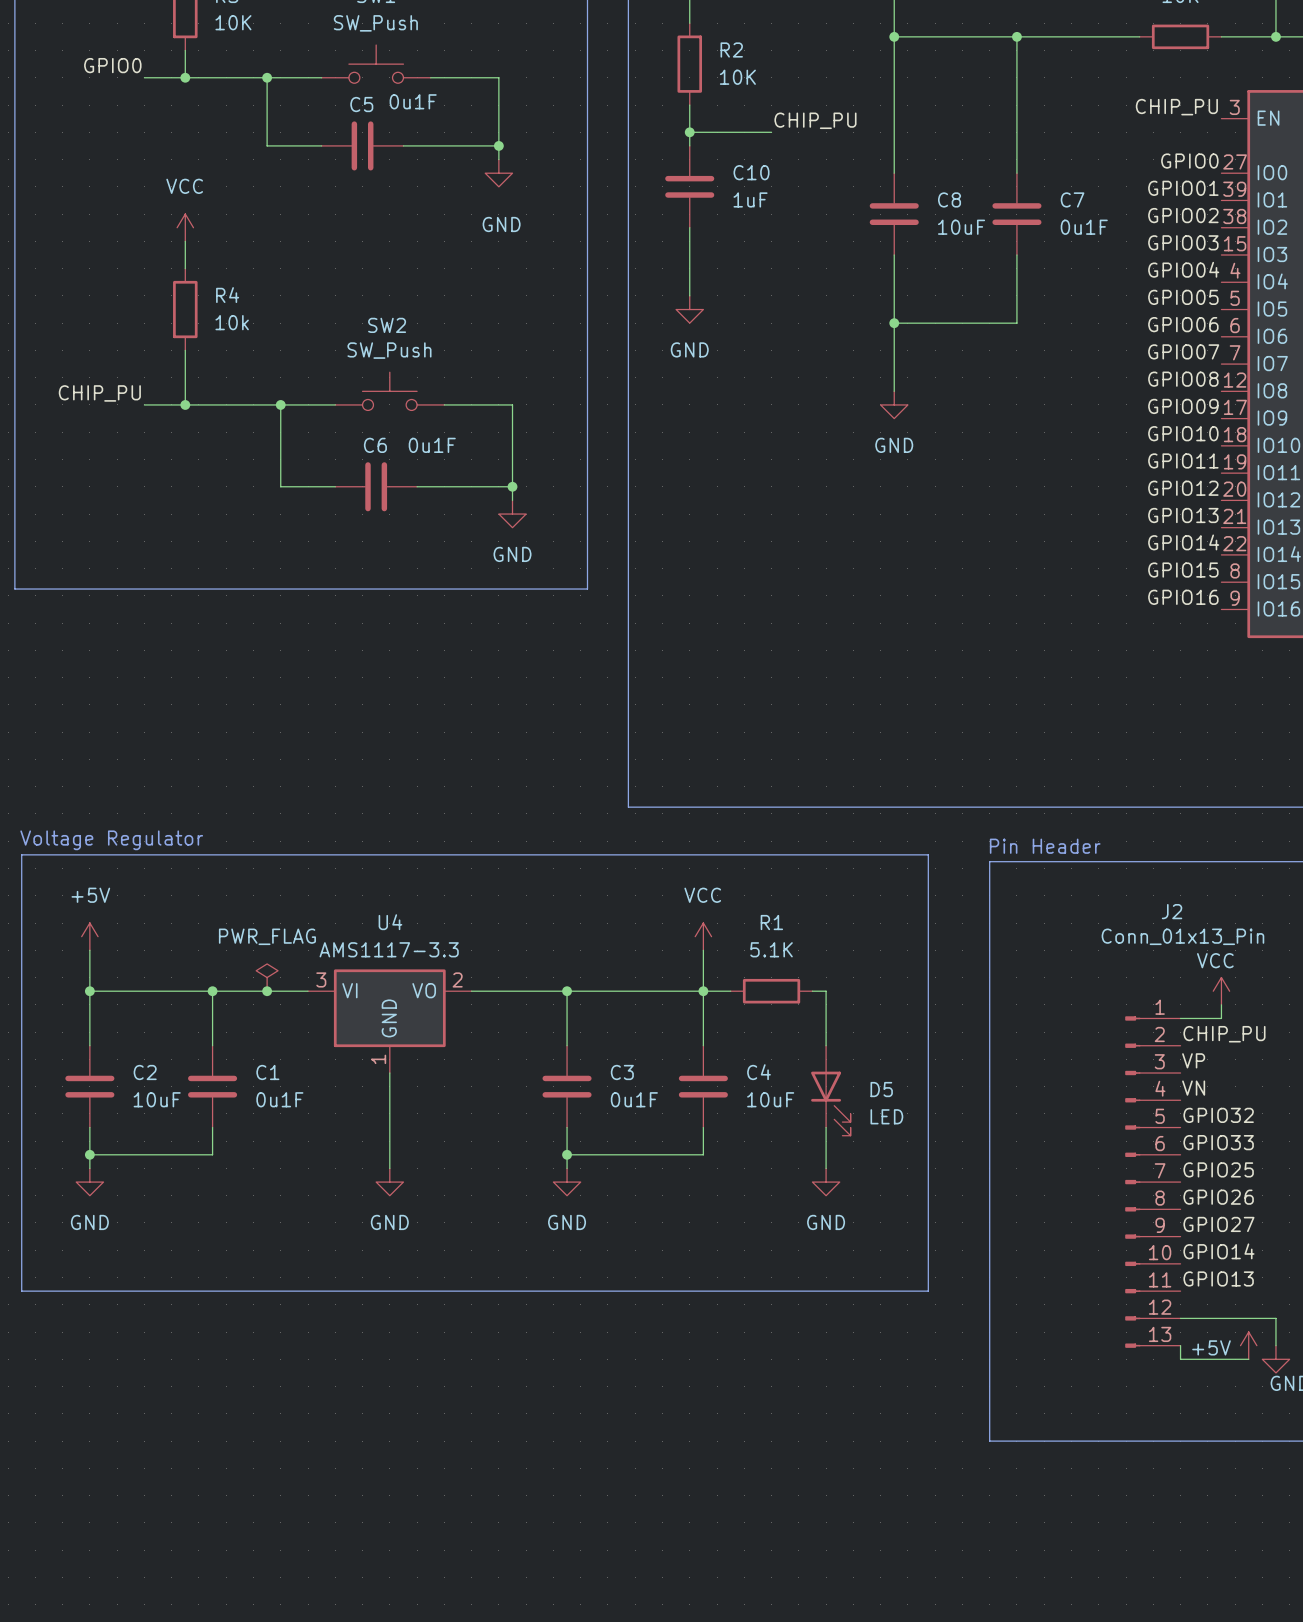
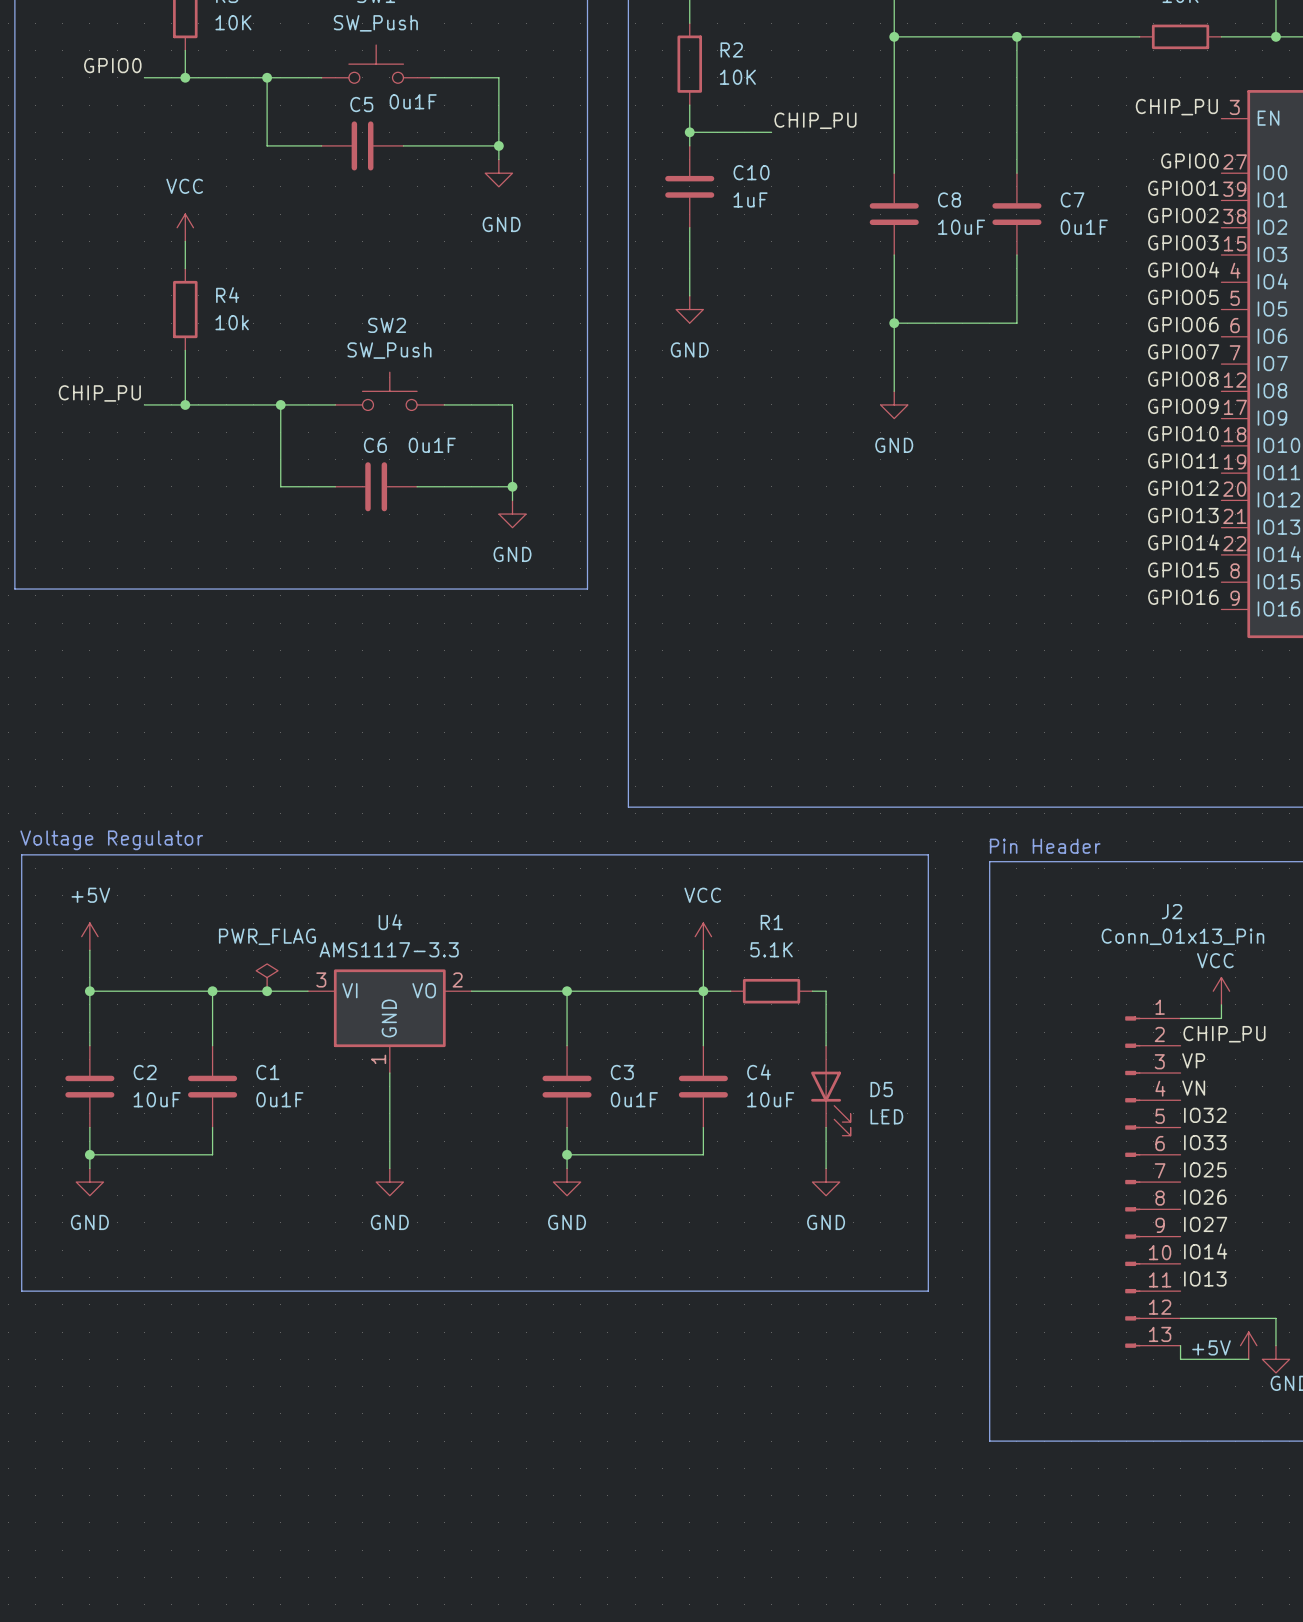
label: GPIO32 (1218, 1115) -> IO32 (1205, 1115)
label: GPIO33 (1218, 1142) -> IO33 (1205, 1142)
label: GPIO25 (1218, 1169) -> IO25 (1205, 1169)
label: GPIO26 (1218, 1197) -> IO26 (1205, 1197)
label: GPIO27 (1218, 1224) -> IO27 (1205, 1224)
label: GPIO14 (1218, 1251) -> IO14 (1205, 1251)
label: GPIO13 (1218, 1278) -> IO13 (1205, 1278)

